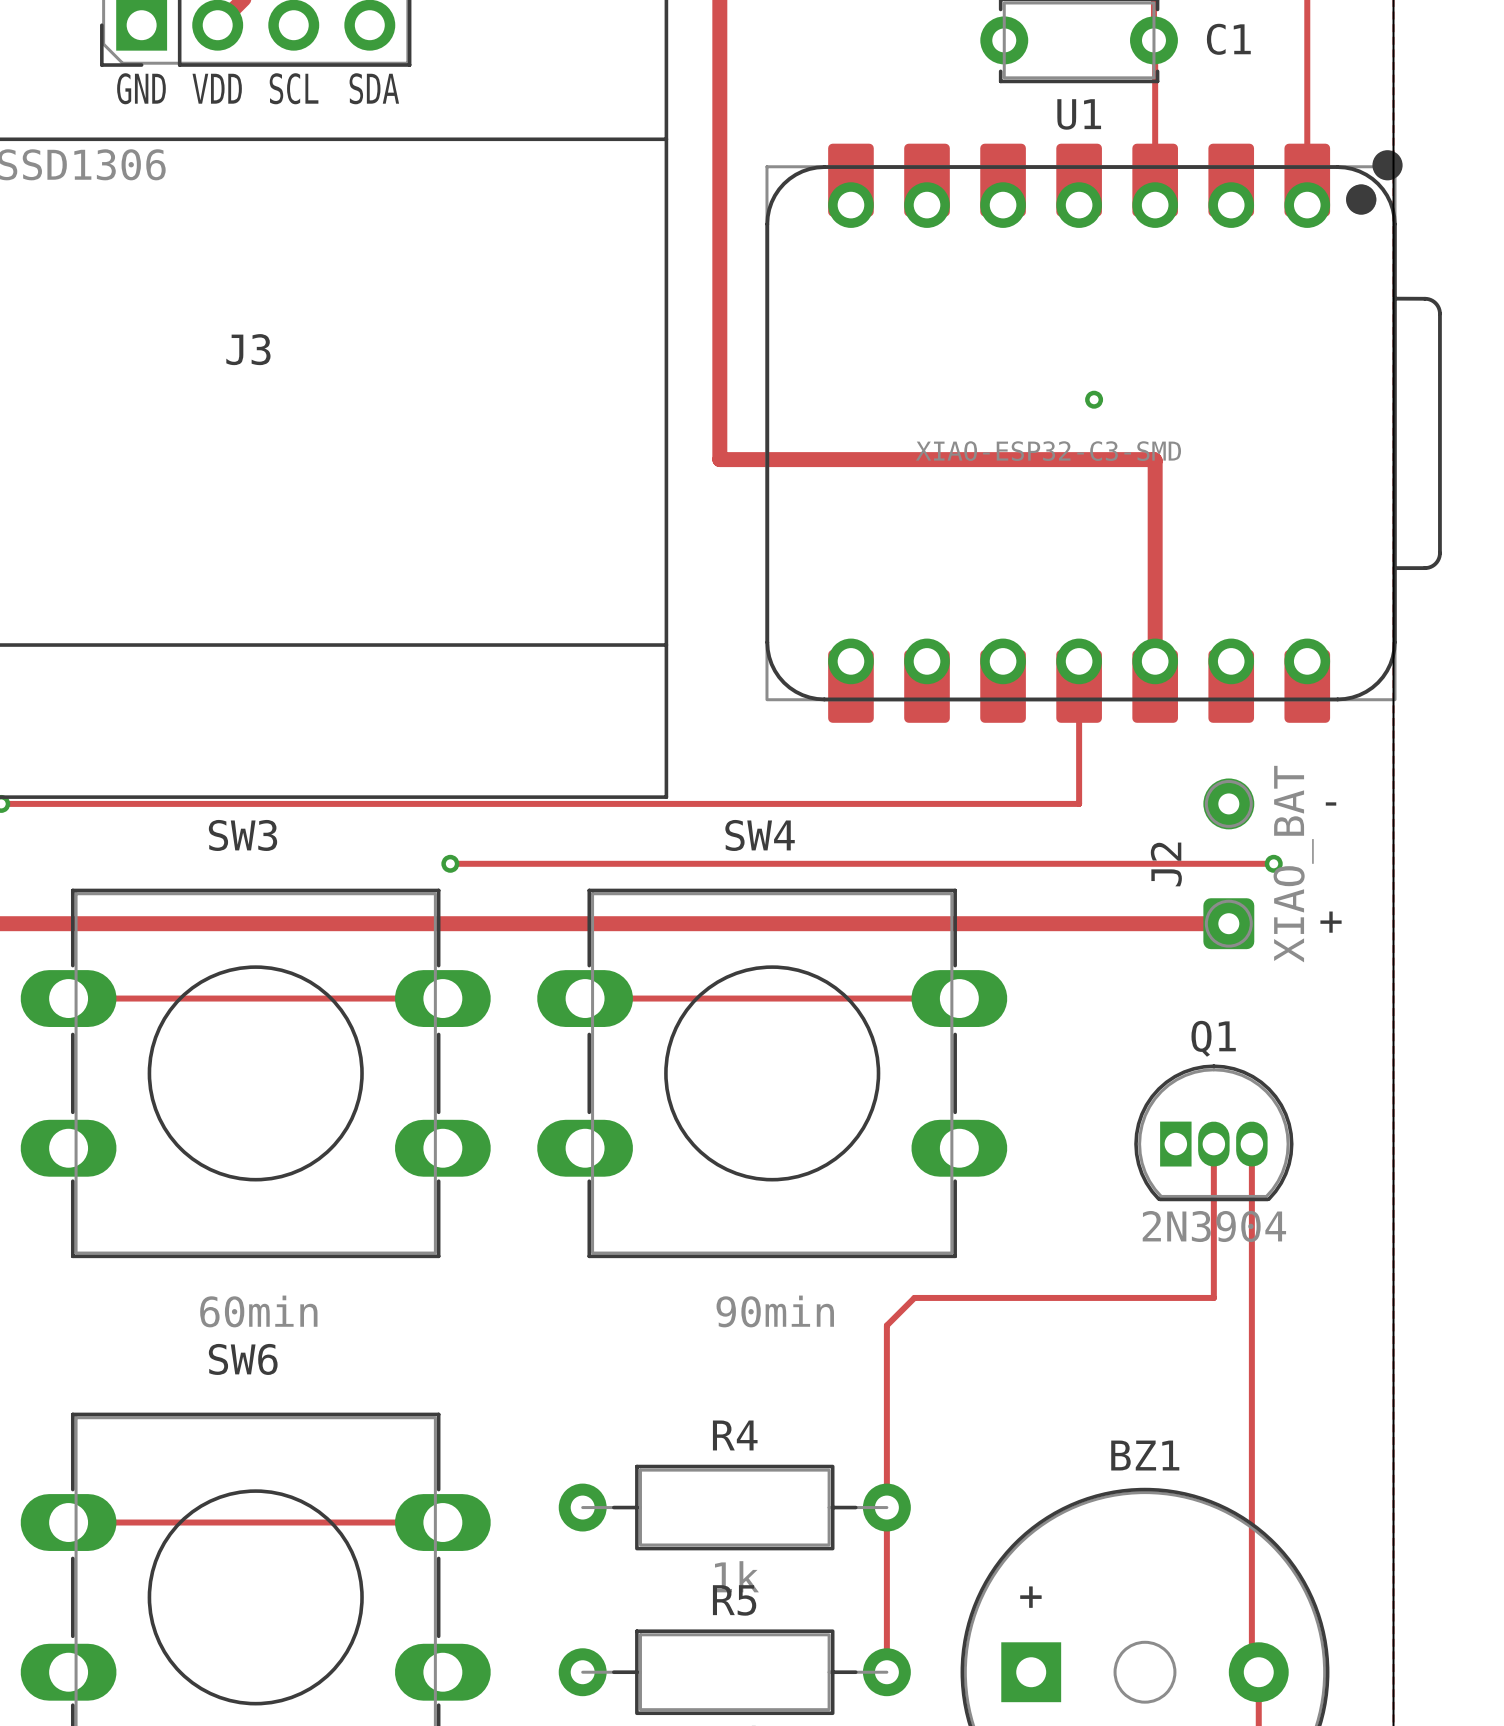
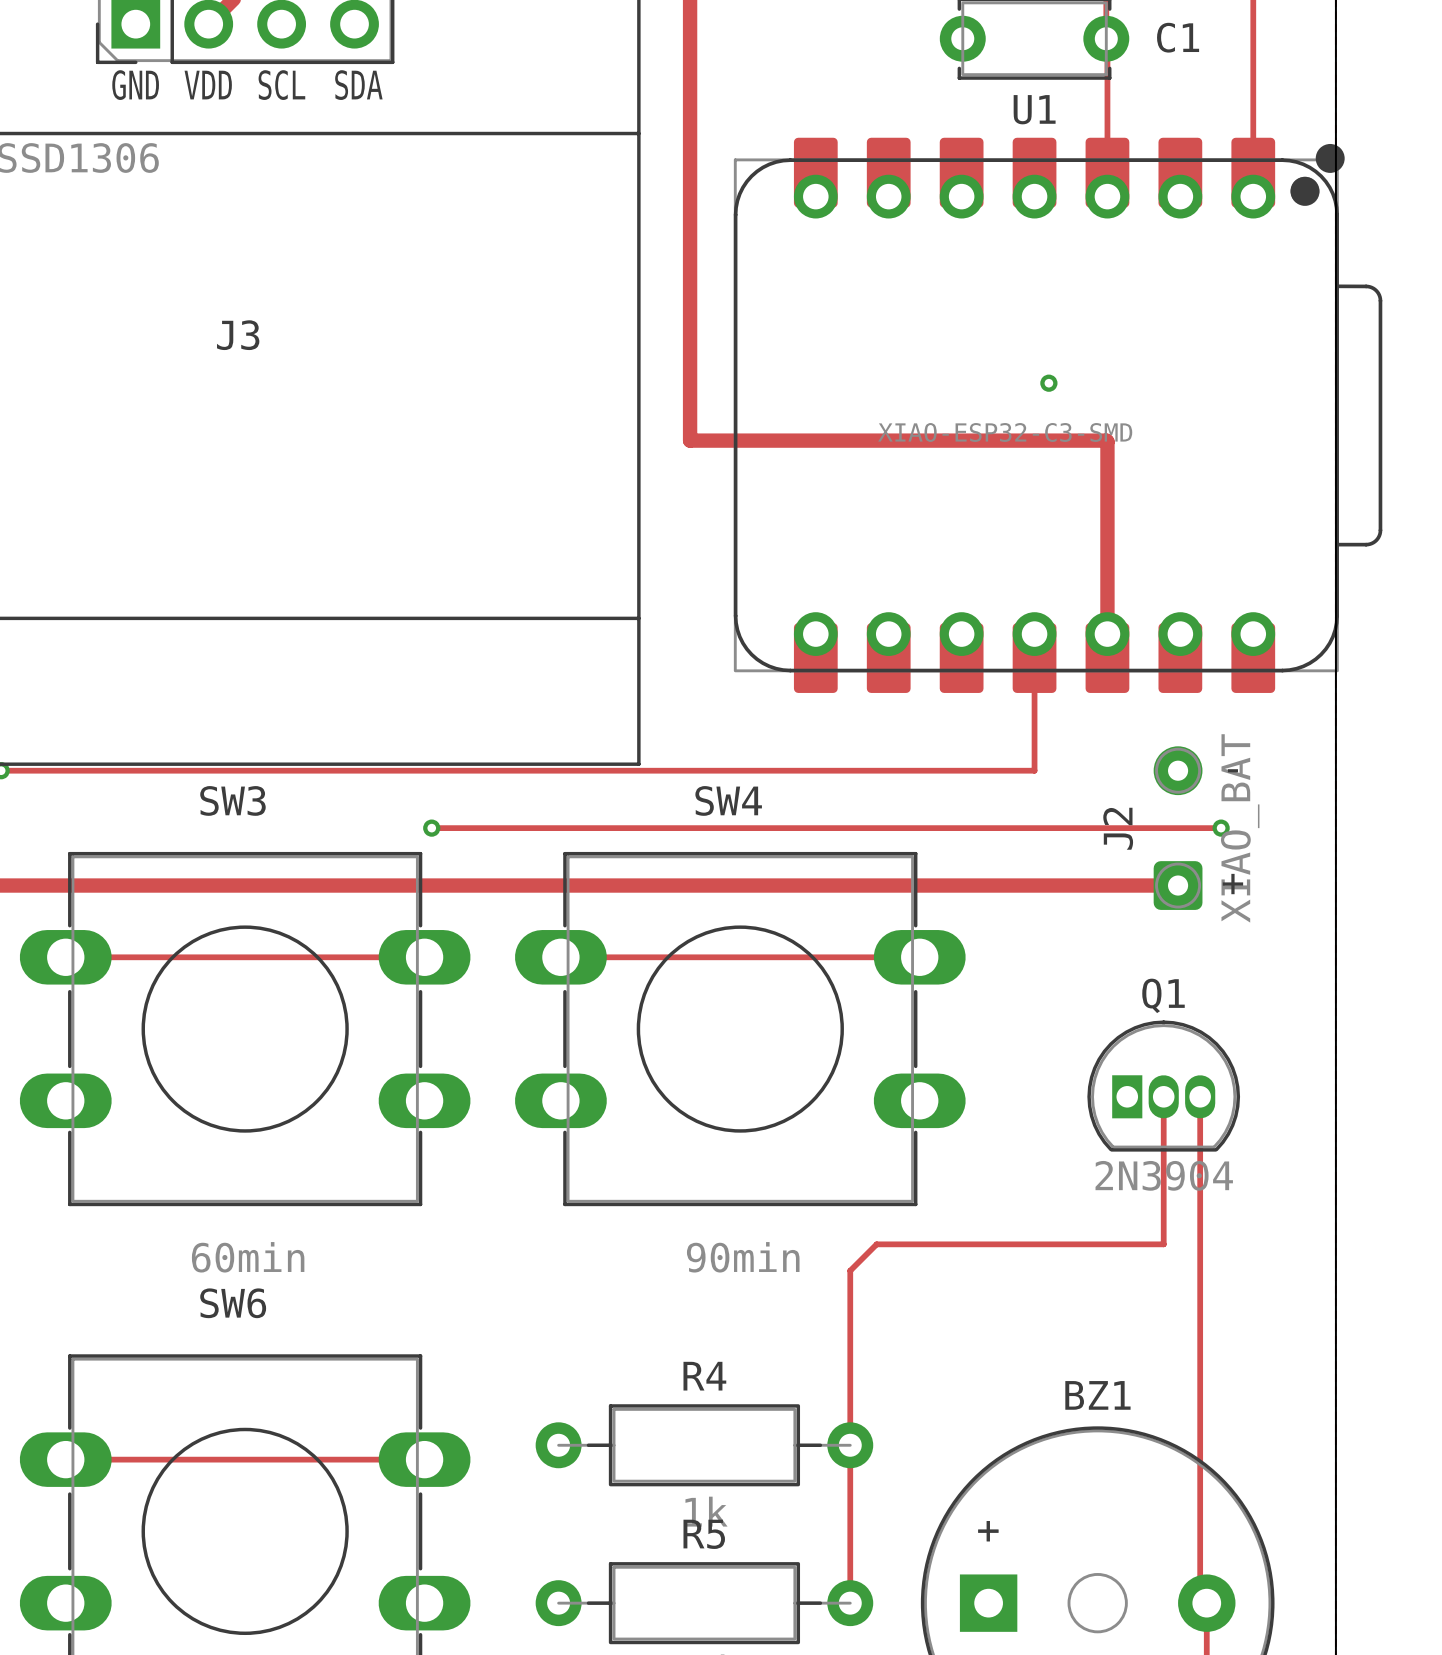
text position: - (1331, 803) -> - (1232, 770)
text position: + (1331, 922) -> + (1232, 884)

